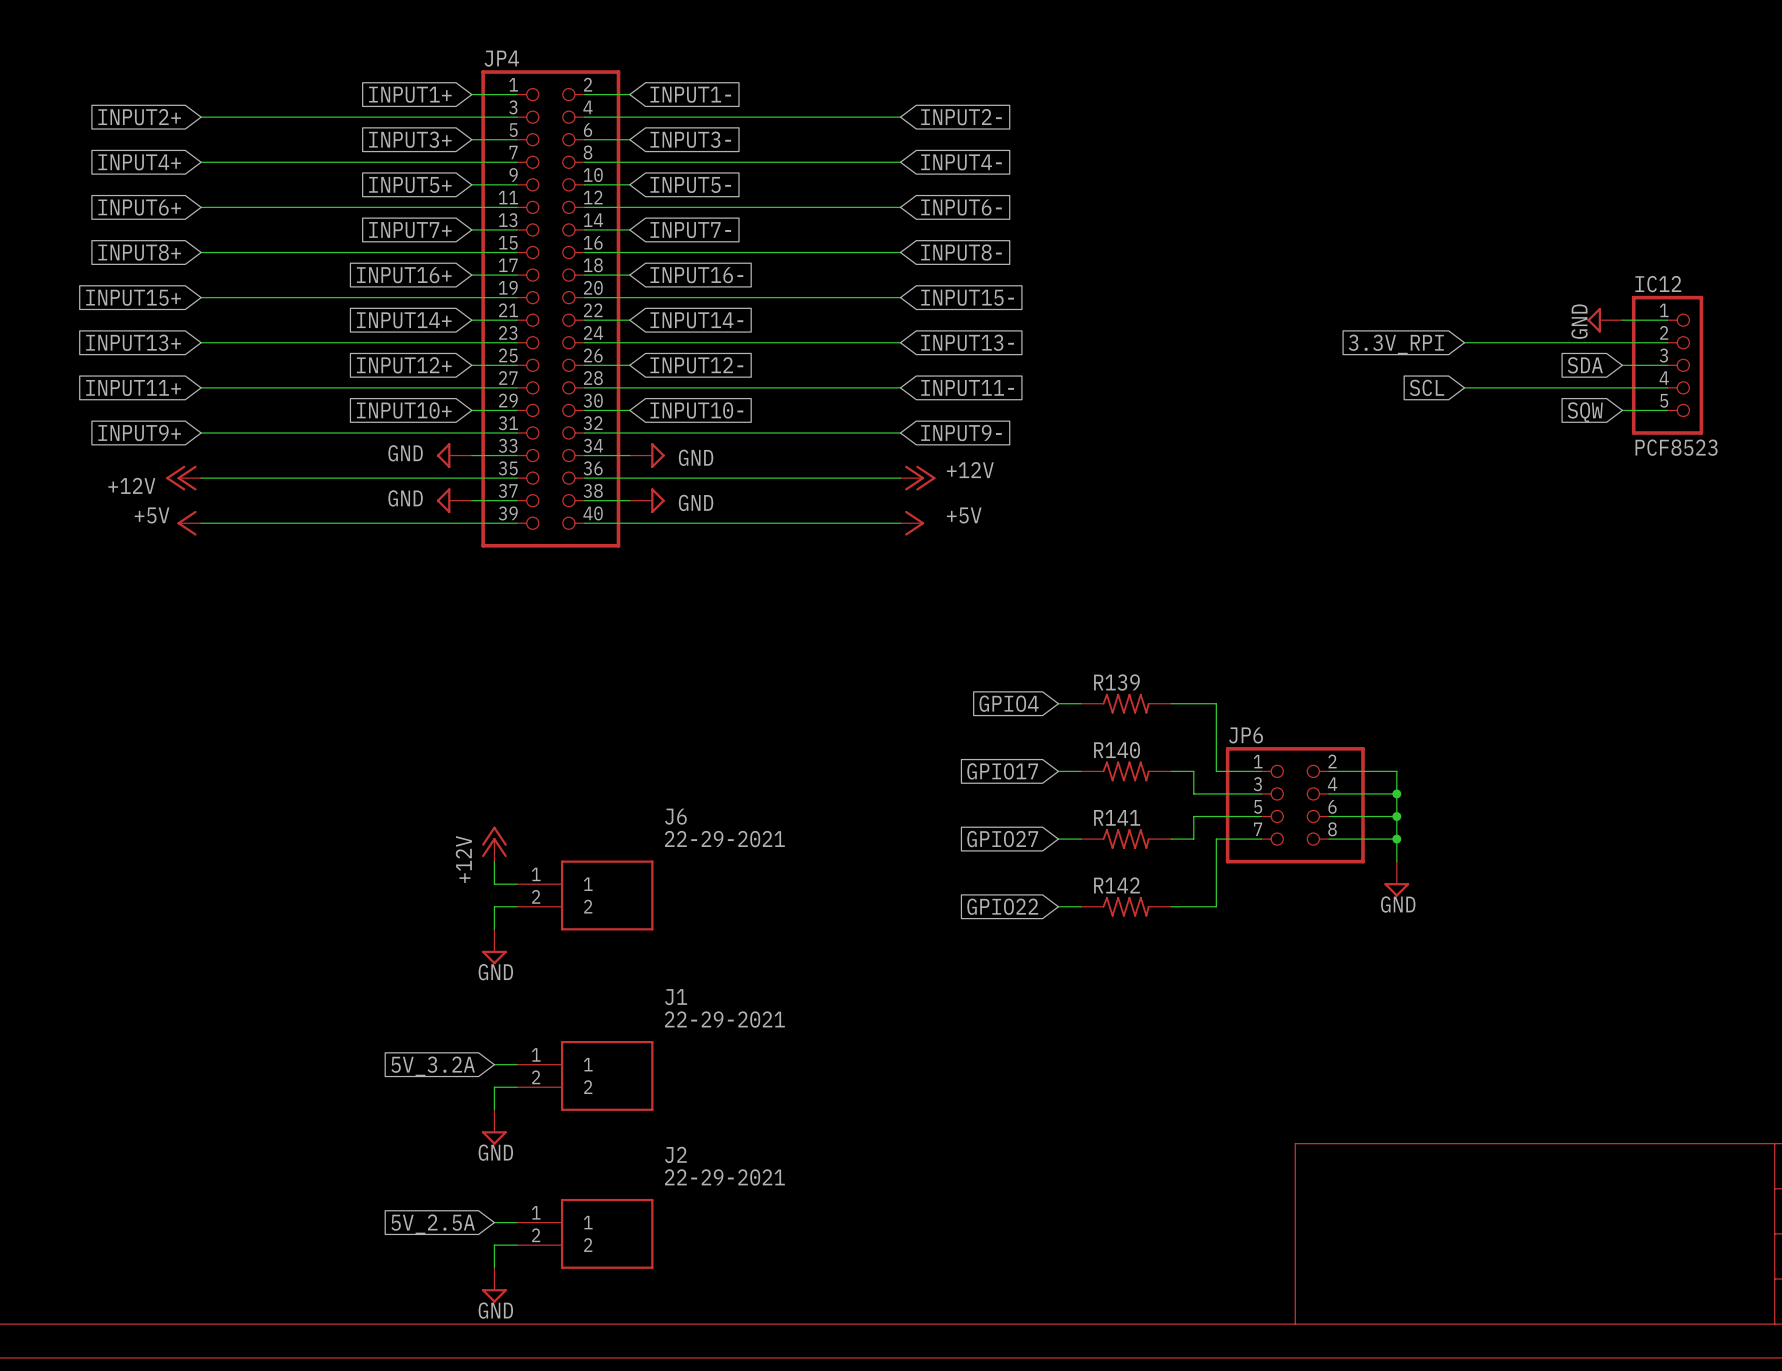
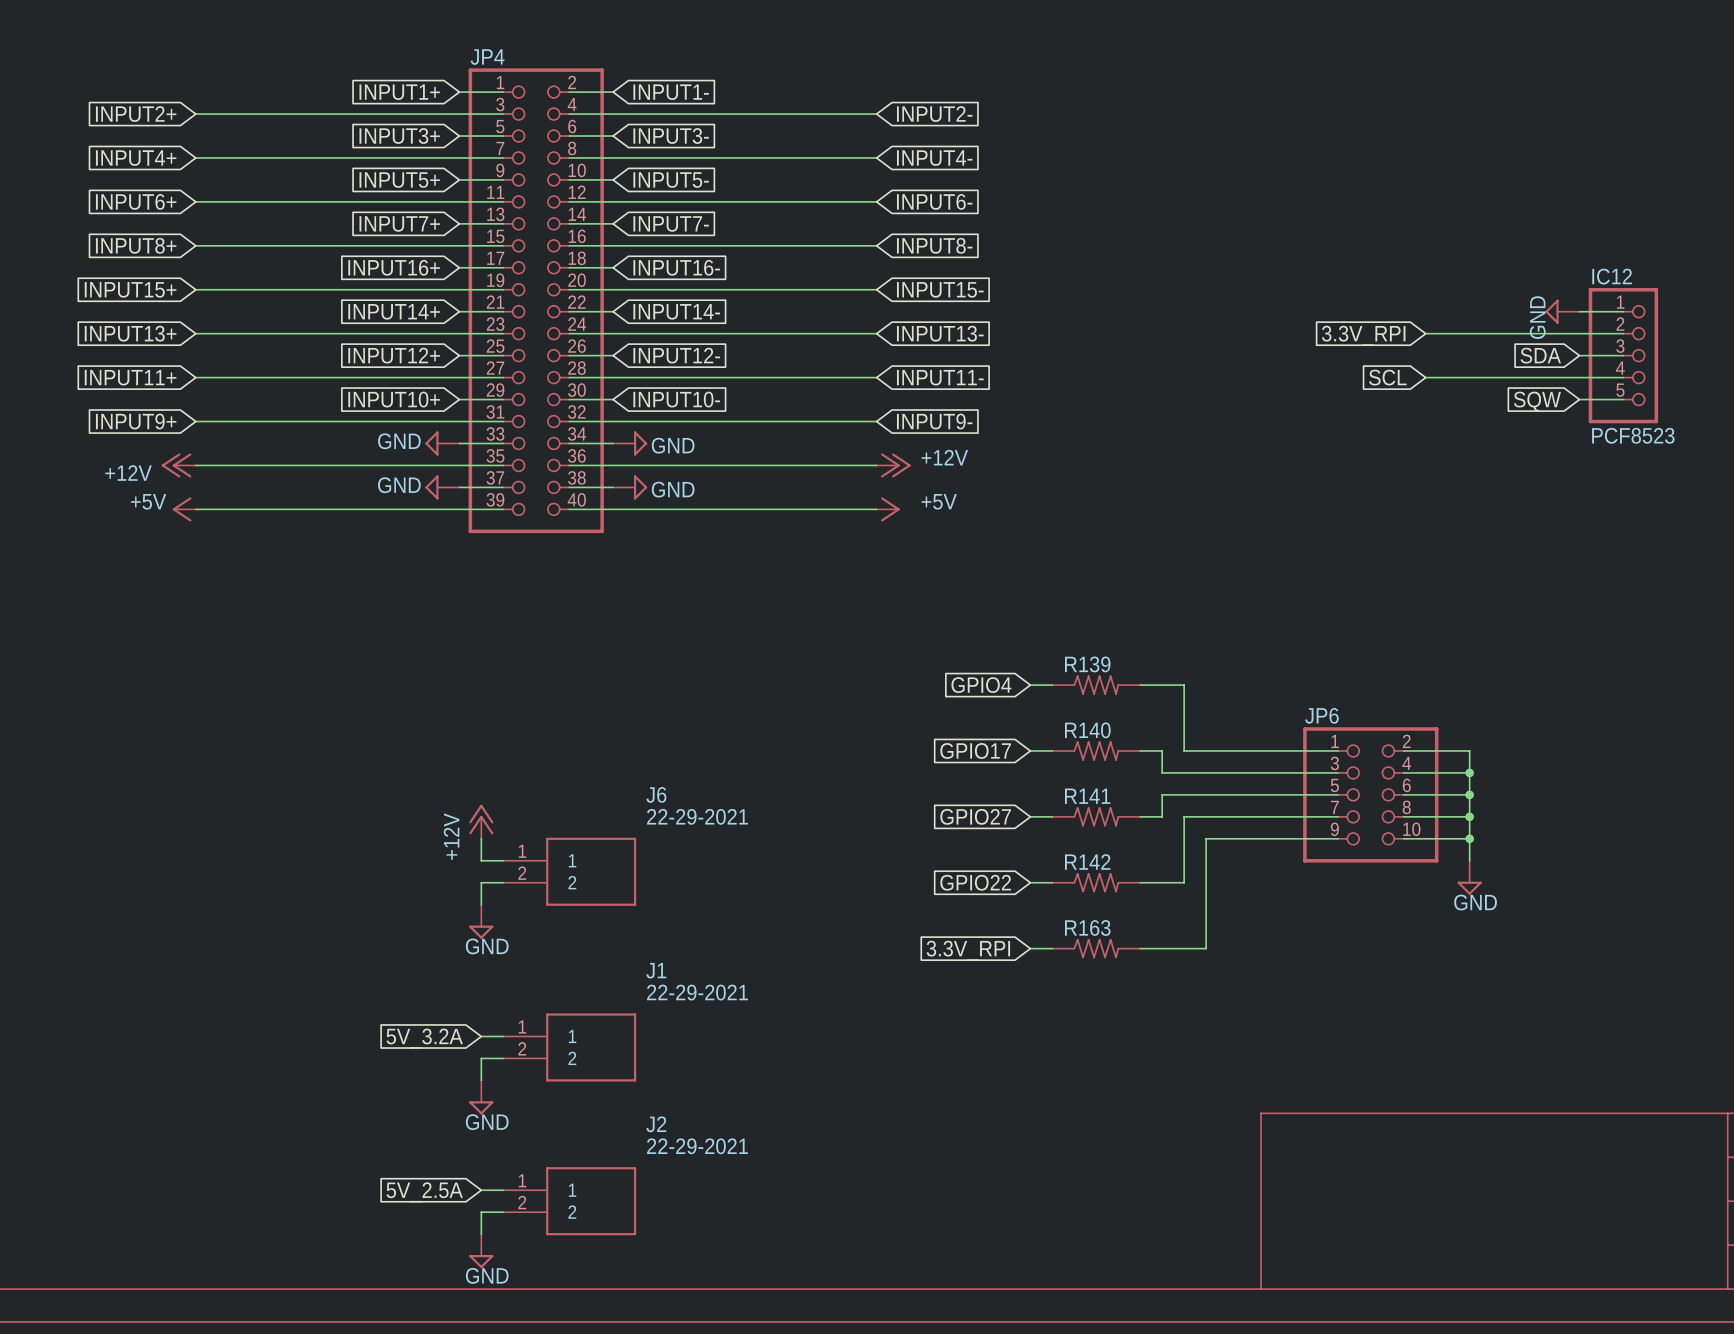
JP6 symbol: [1225, 747, 1365, 864] -> [1303, 727, 1439, 863]
wire: none -> (1228, 750) (1293, 750)
wire: (1374, 771) (1396, 771) (1396, 861) -> none
wire: none -> (1403, 750) (1469, 750) (1469, 860)
wire: none -> (1228, 772) (1293, 772)
wire: (1374, 793) (1396, 793) -> none
junction: (1396, 793) -> none
wire: none -> (1403, 772) (1469, 772)
junction: none -> (1469, 772)
wire: none -> (1228, 794) (1293, 794)
wire: (1374, 816) (1396, 816) -> none
junction: (1396, 816) -> none
wire: none -> (1403, 794) (1469, 794)
junction: none -> (1469, 794)
wire: none -> (1228, 816) (1293, 816)
wire: (1374, 839) (1396, 839) -> none
junction: (1396, 839) -> none
wire: none -> (1403, 816) (1469, 816)
junction: none -> (1469, 816)
wire: none -> (1337, 838) (1206, 838) (1206, 948) (1140, 948)
wire: none -> (1403, 838) (1469, 838)
junction: none -> (1469, 838)
power symbol position: GND (1396, 879) -> GND (1469, 877)
wire: none -> (1030, 948) (1052, 948)
R163: none -> (1096, 948)
global label: none -> 3.3V_RPI (968, 950)

